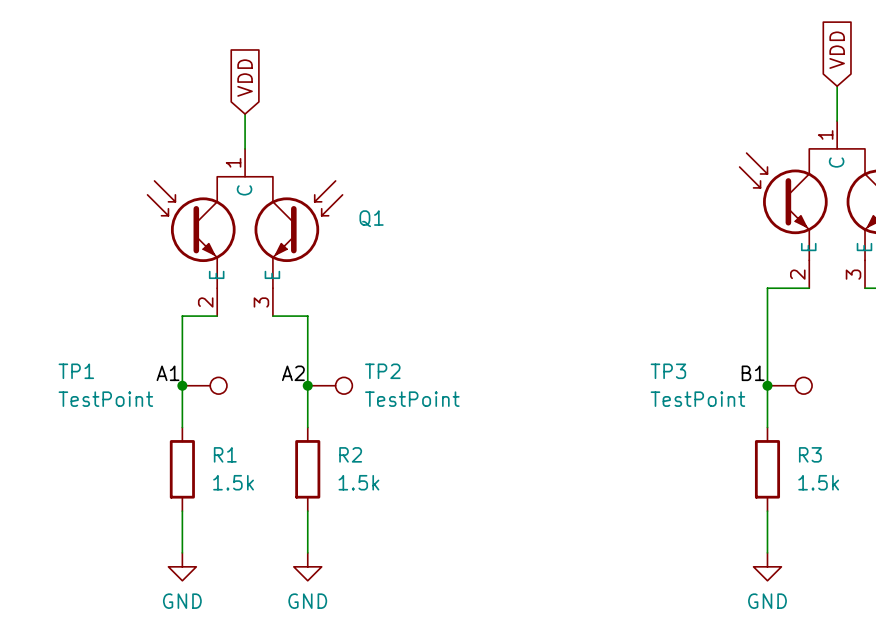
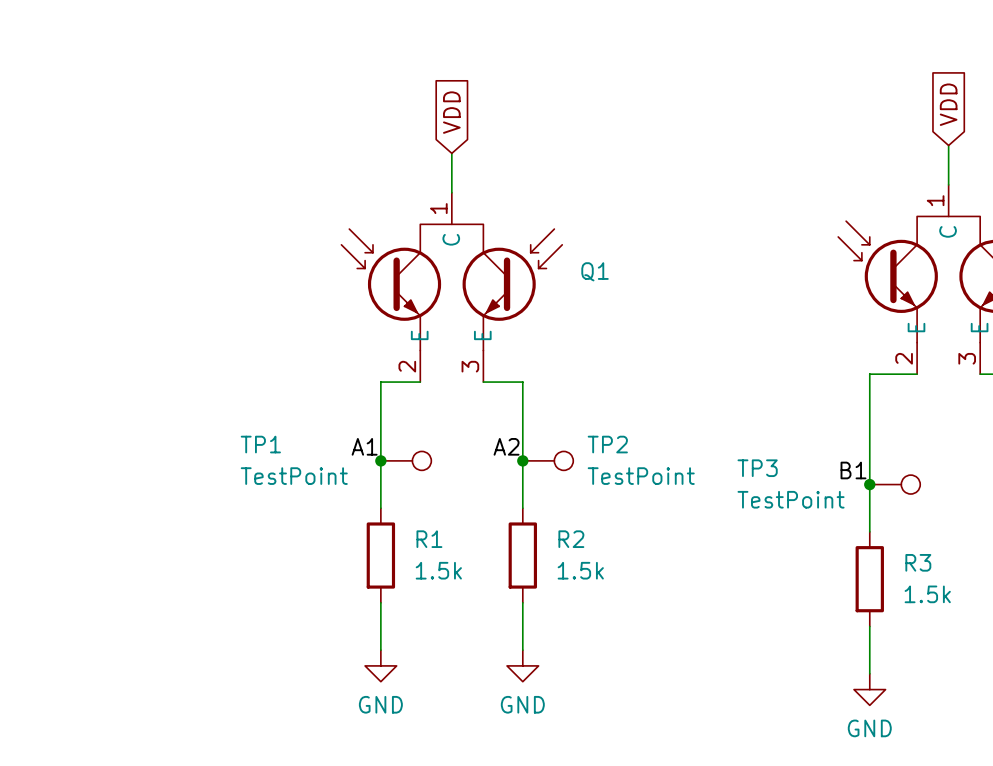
global label position: VDD (245, 78) -> VDD (451, 112)
wire: (245, 114) (245, 148) -> (451, 153) (451, 192)
Q1 position: (245, 232) -> (451, 287)
wire: (217, 316) (182, 316) (182, 427) -> (420, 382) (380, 382) (380, 508)
wire: (272, 316) (307, 316) (307, 427) -> (483, 382) (522, 382) (522, 508)
junction: none -> (522, 460)
label position: A1 (168, 373) -> A1 (364, 446)
label position: A2 (293, 373) -> A2 (506, 446)
junction: (182, 385) -> none
TP1 position: (204, 385) -> (406, 460)
junction position: (307, 385) -> (380, 460)
TP2 position: (330, 385) -> (548, 460)
R1 position: (182, 469) -> (380, 555)
R2 position: (307, 469) -> (522, 555)
wire: (182, 511) (182, 552) -> (380, 602) (380, 650)
wire: (307, 511) (307, 552) -> (522, 602) (522, 650)
power symbol: none -> GND (522, 665)
power symbol: GND (182, 566) -> none
power symbol position: GND (307, 566) -> GND (380, 665)

